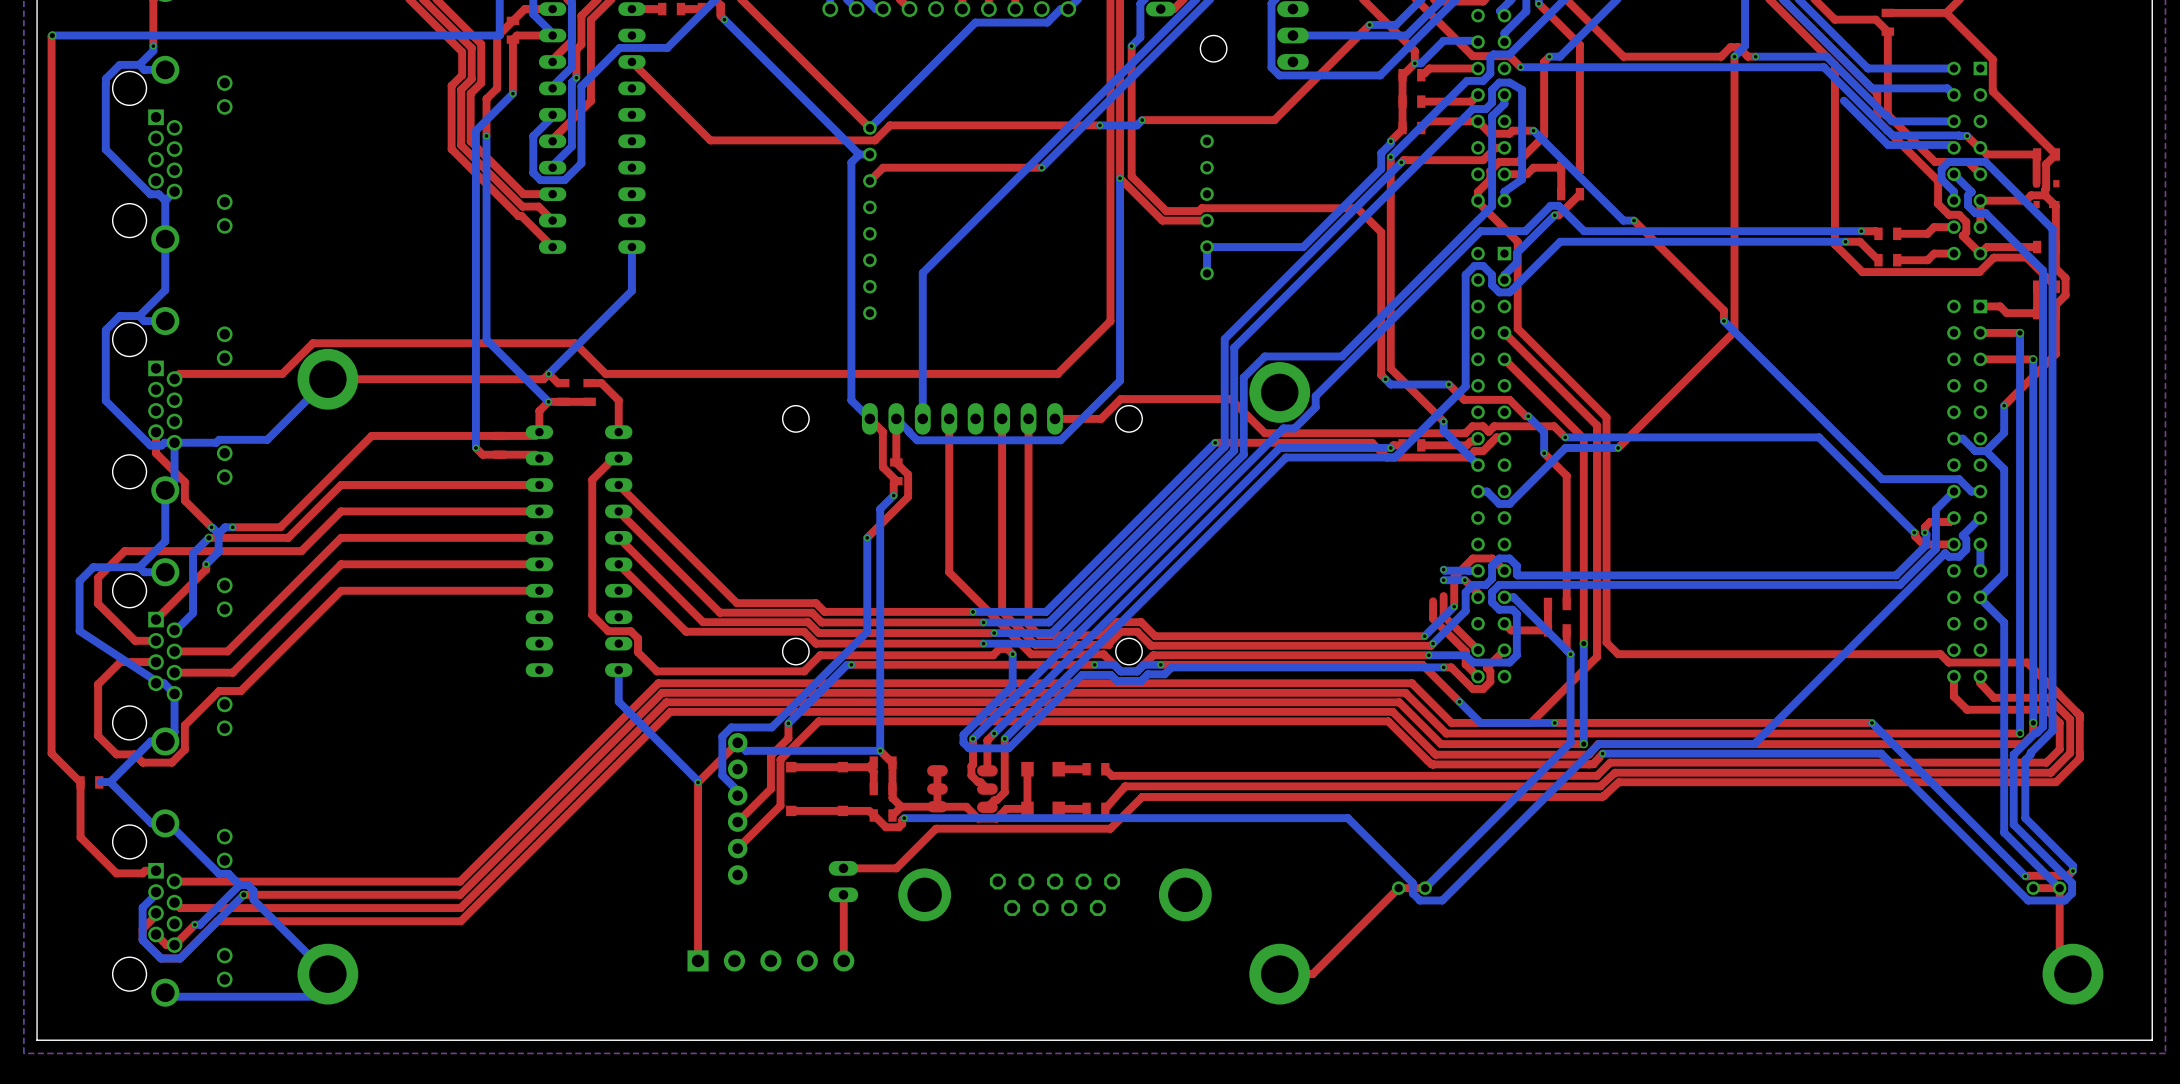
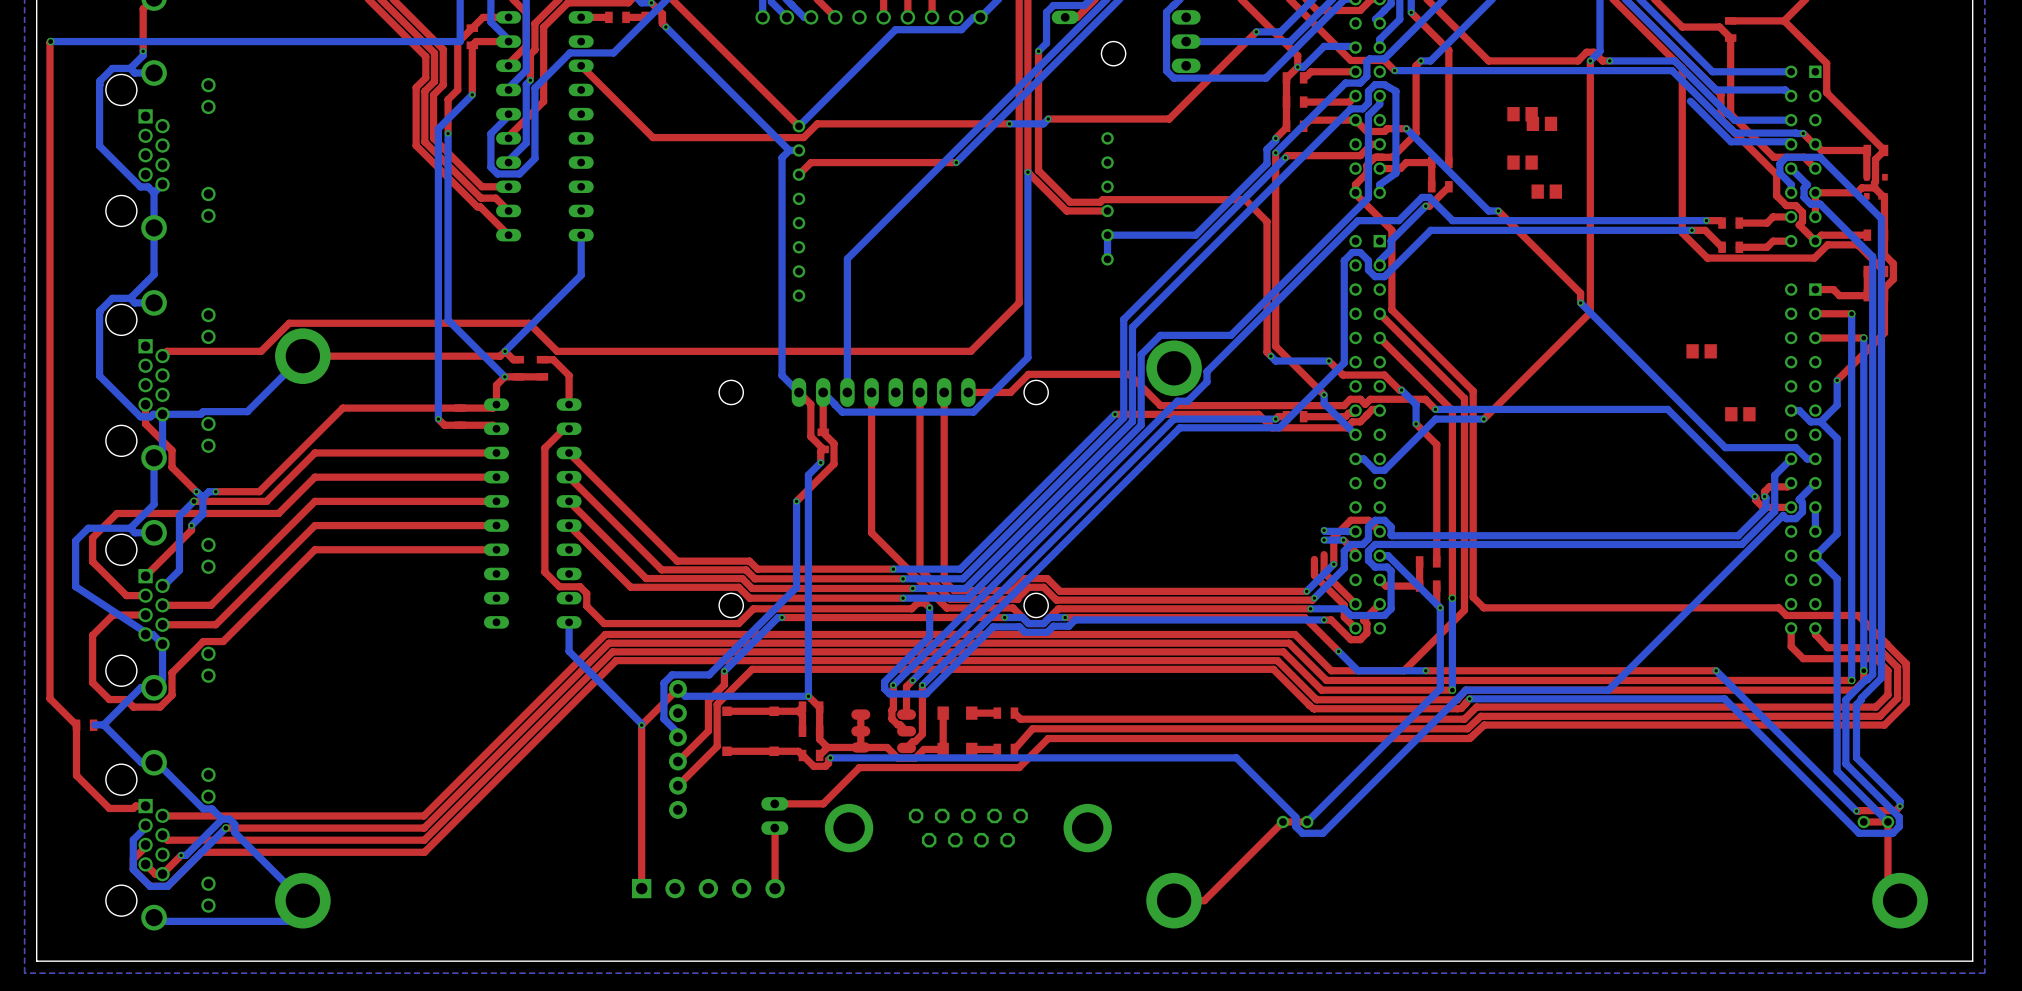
part: none -> (1522, 114)
part: none -> (1541, 123)
part: none -> (1522, 162)
part: none -> (1546, 191)
part: none -> (1701, 351)
part: none -> (1740, 414)

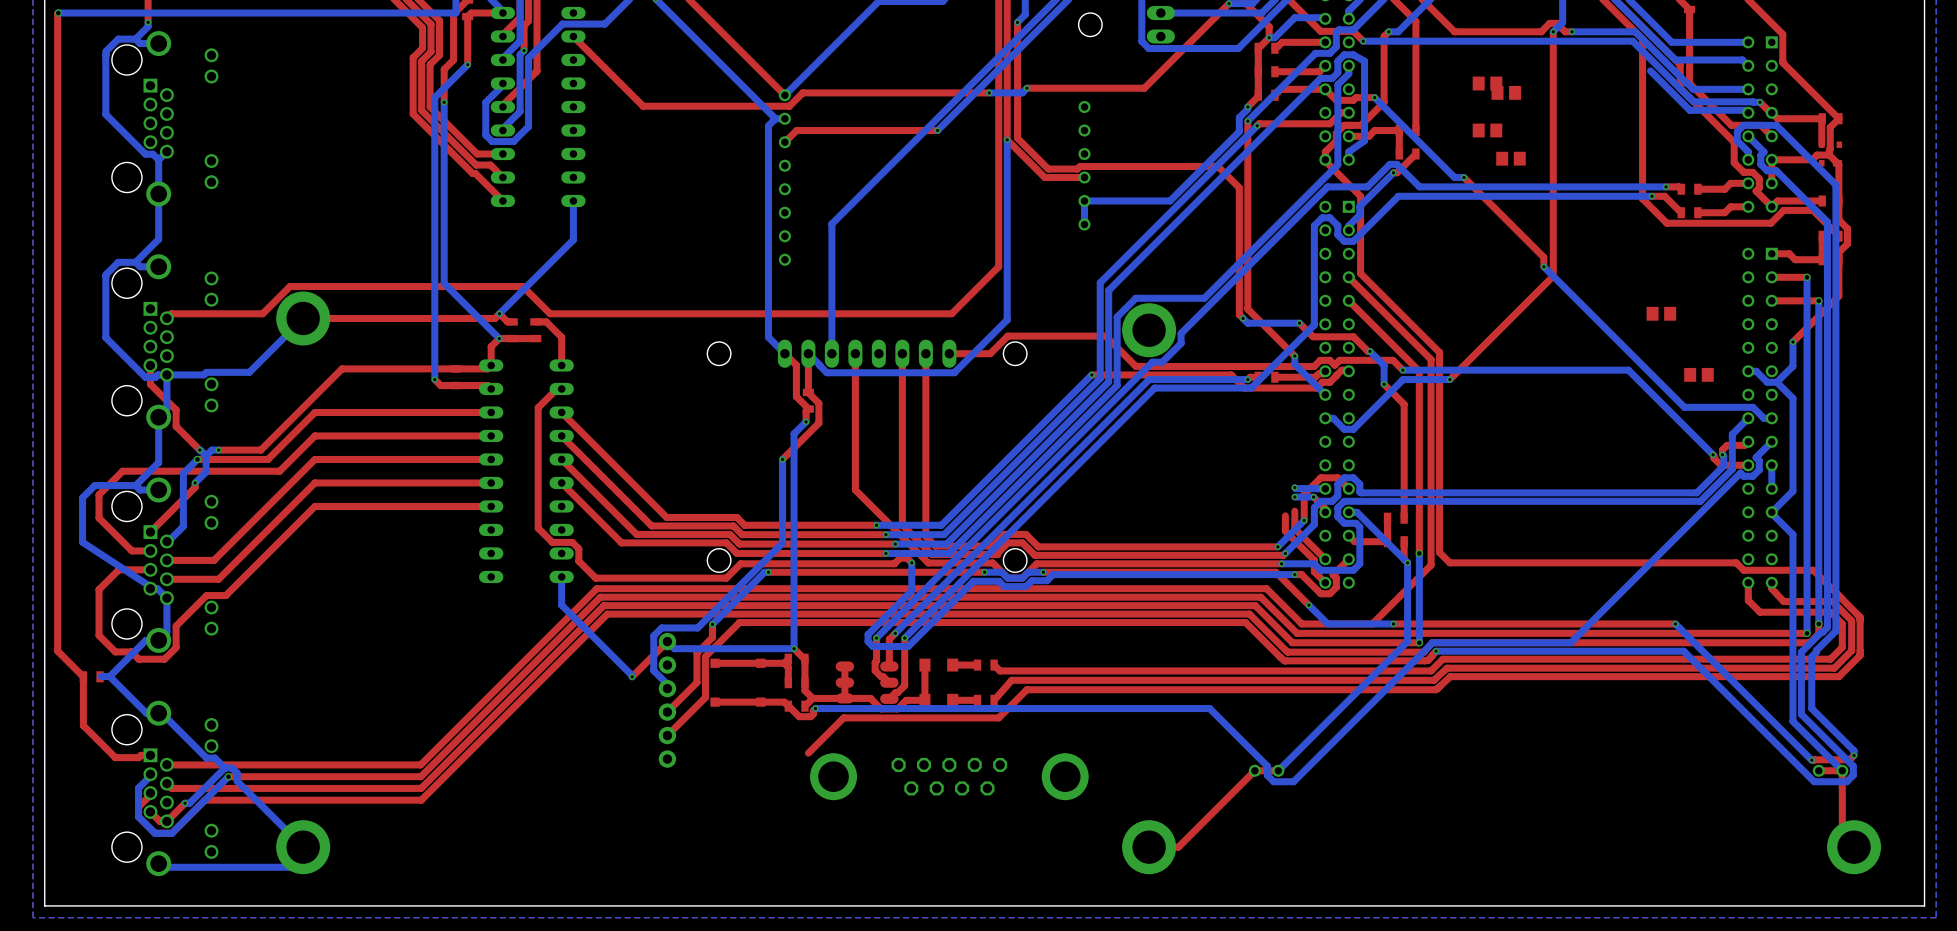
top track: (641, 725) (641, 888) -> none
top track: (823, 803) (774, 803) -> none
part: (774, 815) -> none
top track: (774, 828) (775, 888) -> none
part: (708, 888) -> none

